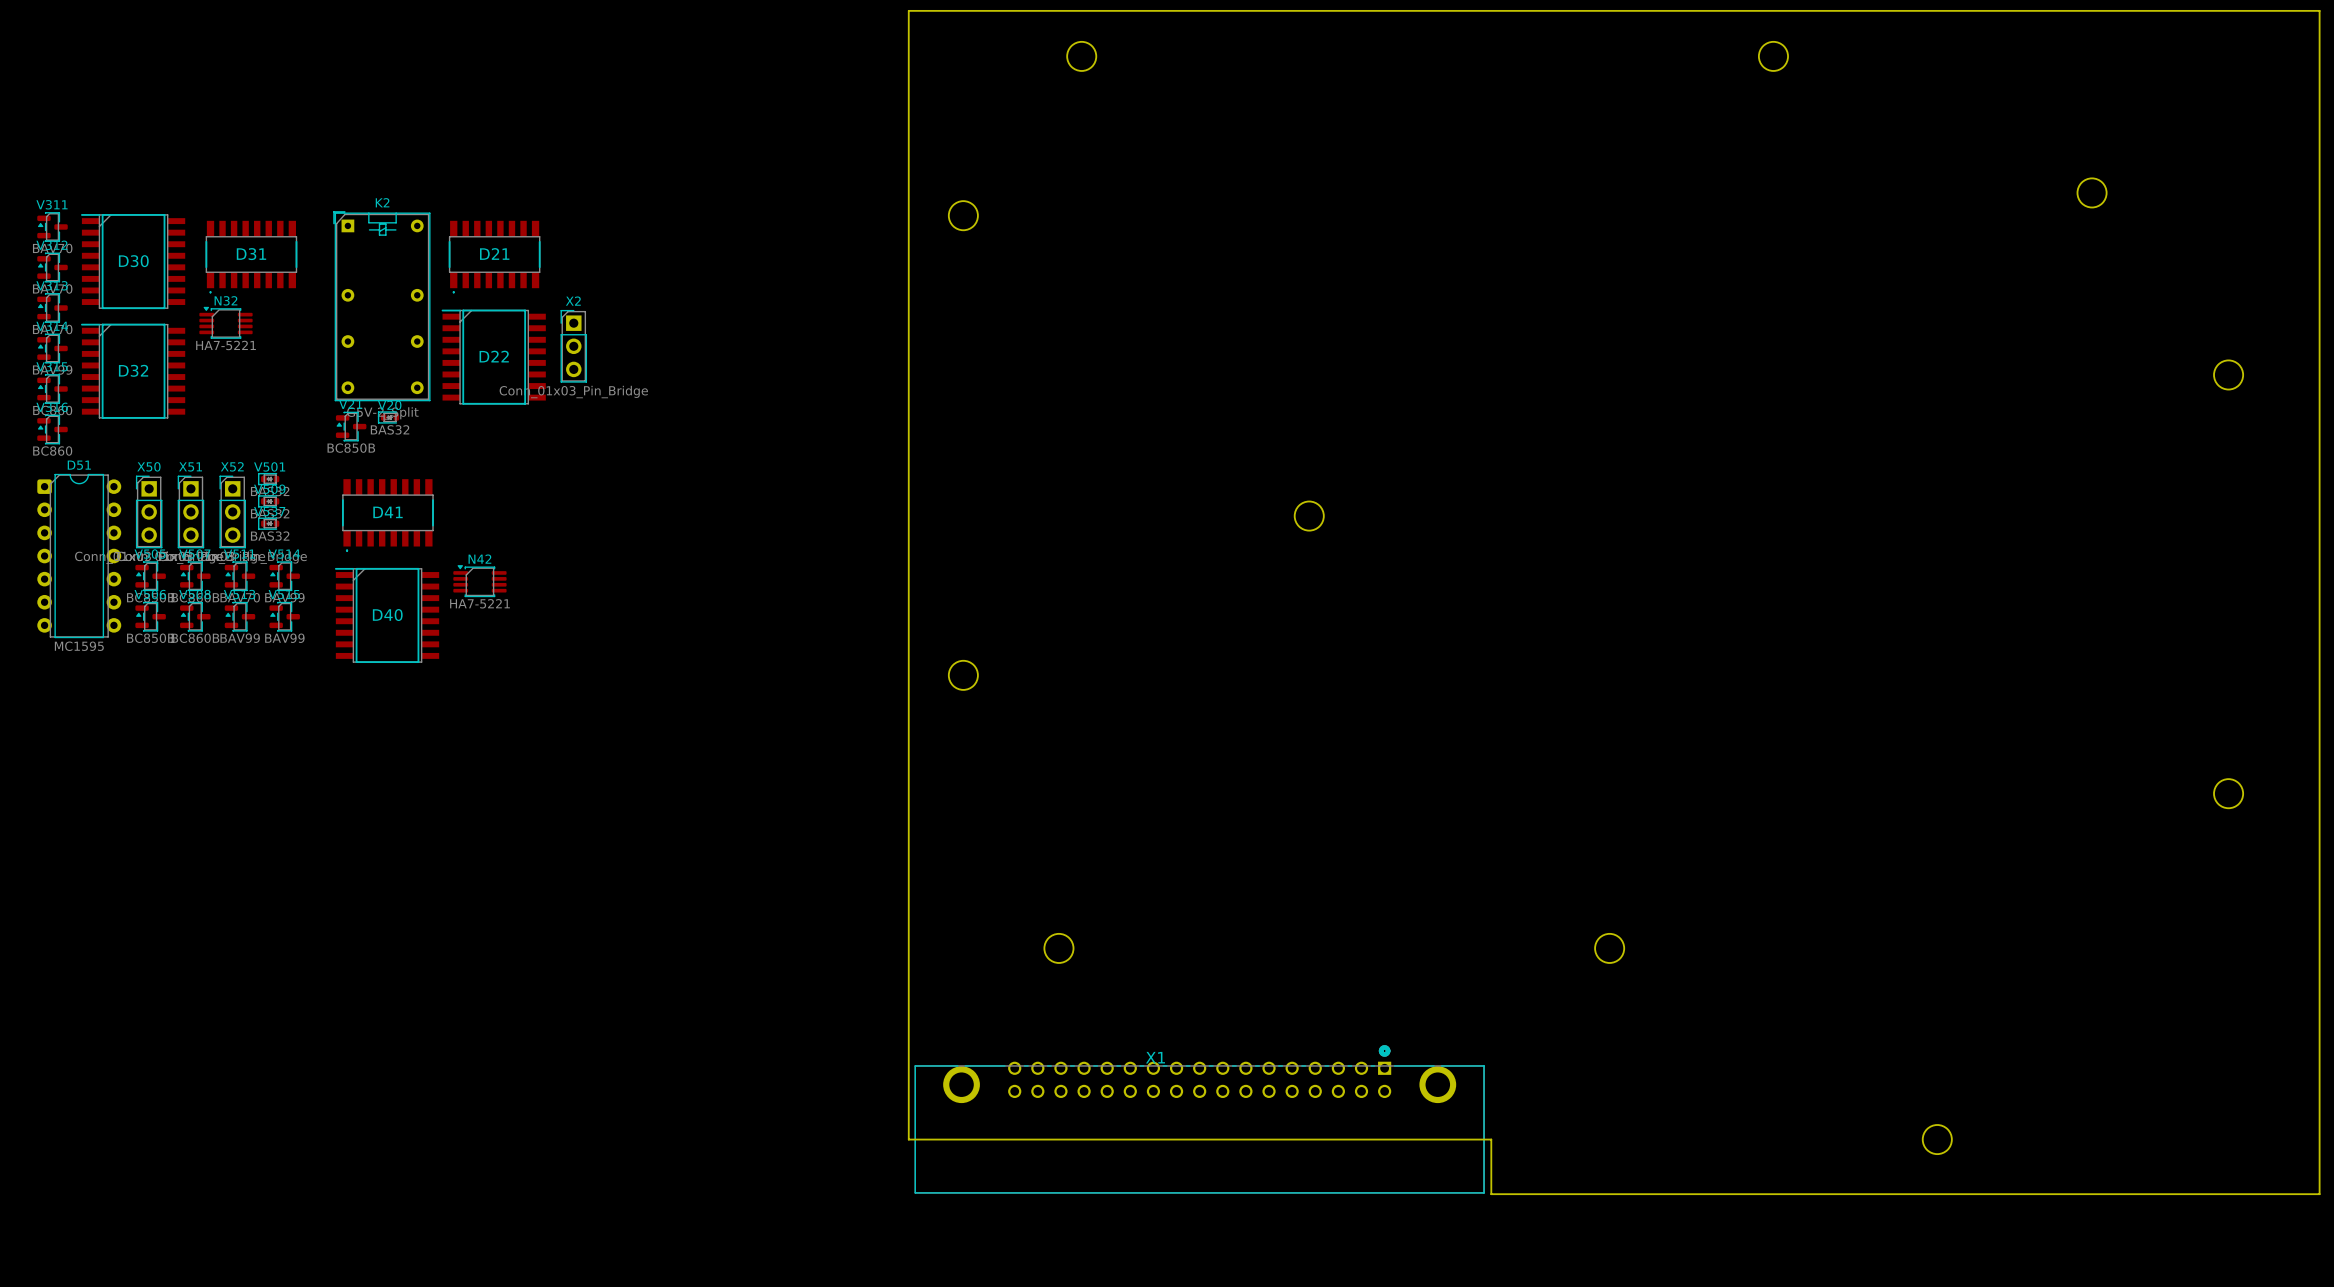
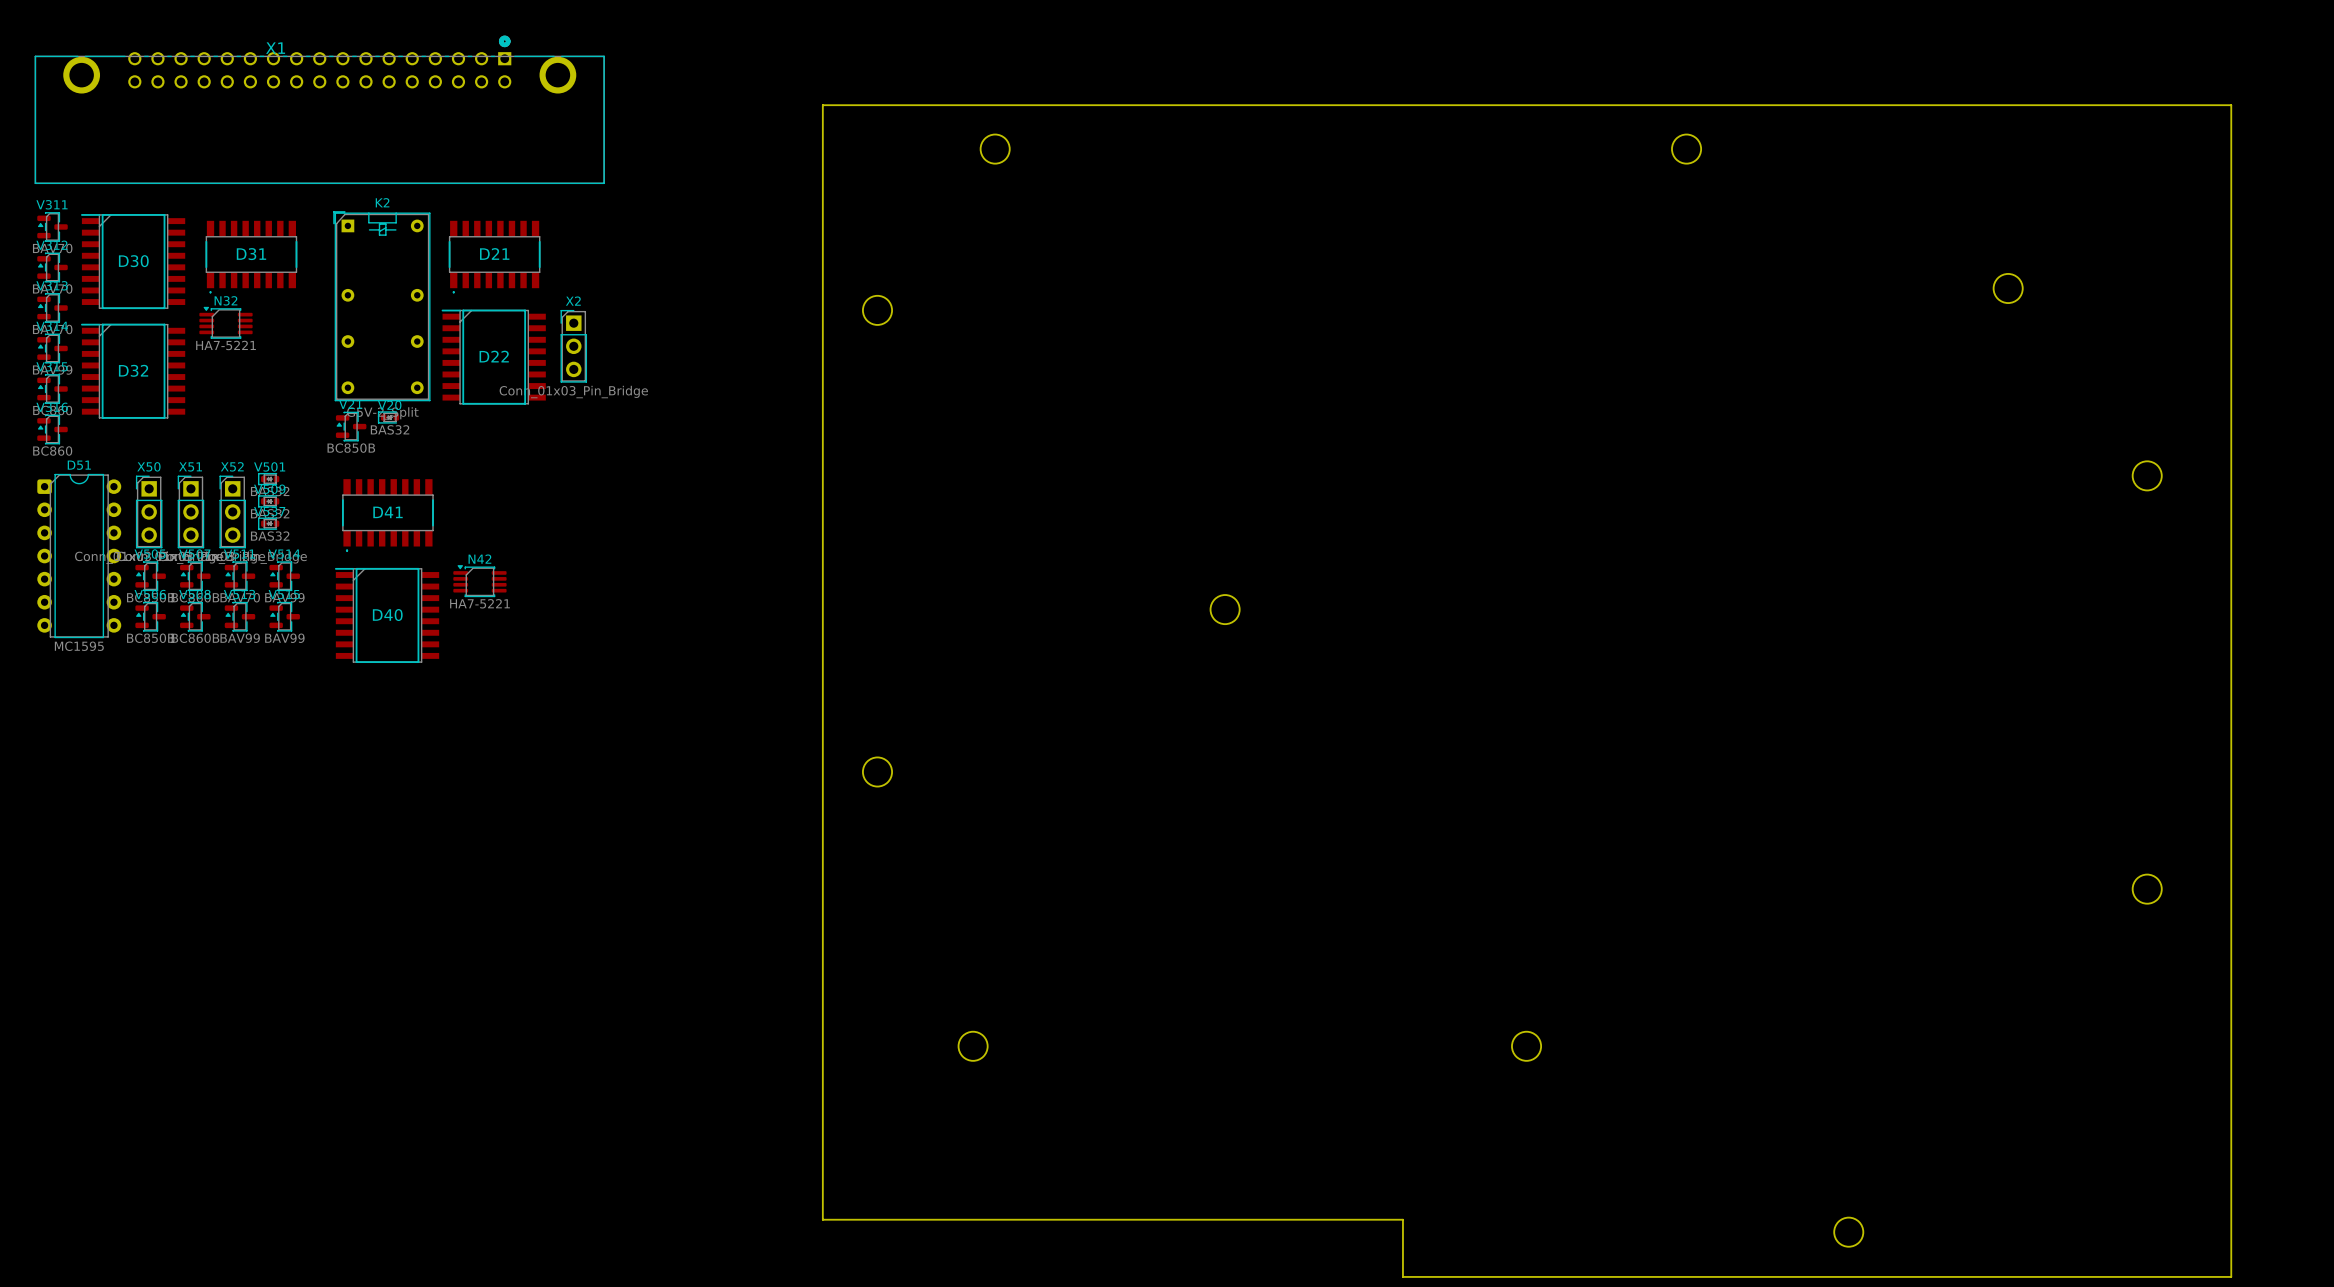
board edge: (908, 10) (908, 1139) (1491, 1139) (1491, 1194) (2319, 1194) (2319, 10) (908, 10) -> (822, 105) (822, 1219) (1402, 1219) (1402, 1276) (2231, 1276) (2231, 105) (822, 105)
round board edge: [1066, 40, 1098, 72] -> none
round board edge position: (1773, 56) -> (1686, 149)
round board edge: none -> [979, 133, 1011, 165]
round board edge: [2076, 177, 2108, 209] -> none
round board edge: [947, 200, 979, 232] -> none
round board edge: none -> [1992, 273, 2024, 304]
round board edge: none -> [862, 294, 893, 326]
round board edge: [2213, 359, 2245, 391] -> none
round board edge: none -> [2131, 460, 2163, 492]
round board edge position: (1309, 516) -> (1225, 609)
round board edge: [947, 659, 979, 691] -> none
round board edge: none -> [862, 756, 893, 788]
round board edge position: (2228, 793) -> (2147, 889)
round board edge: [1043, 932, 1075, 964] -> none
round board edge position: (1609, 948) -> (1526, 1046)
round board edge: none -> [957, 1030, 989, 1062]
X1 position: (1199, 1119) -> (319, 109)
round board edge position: (1937, 1139) -> (1848, 1232)

